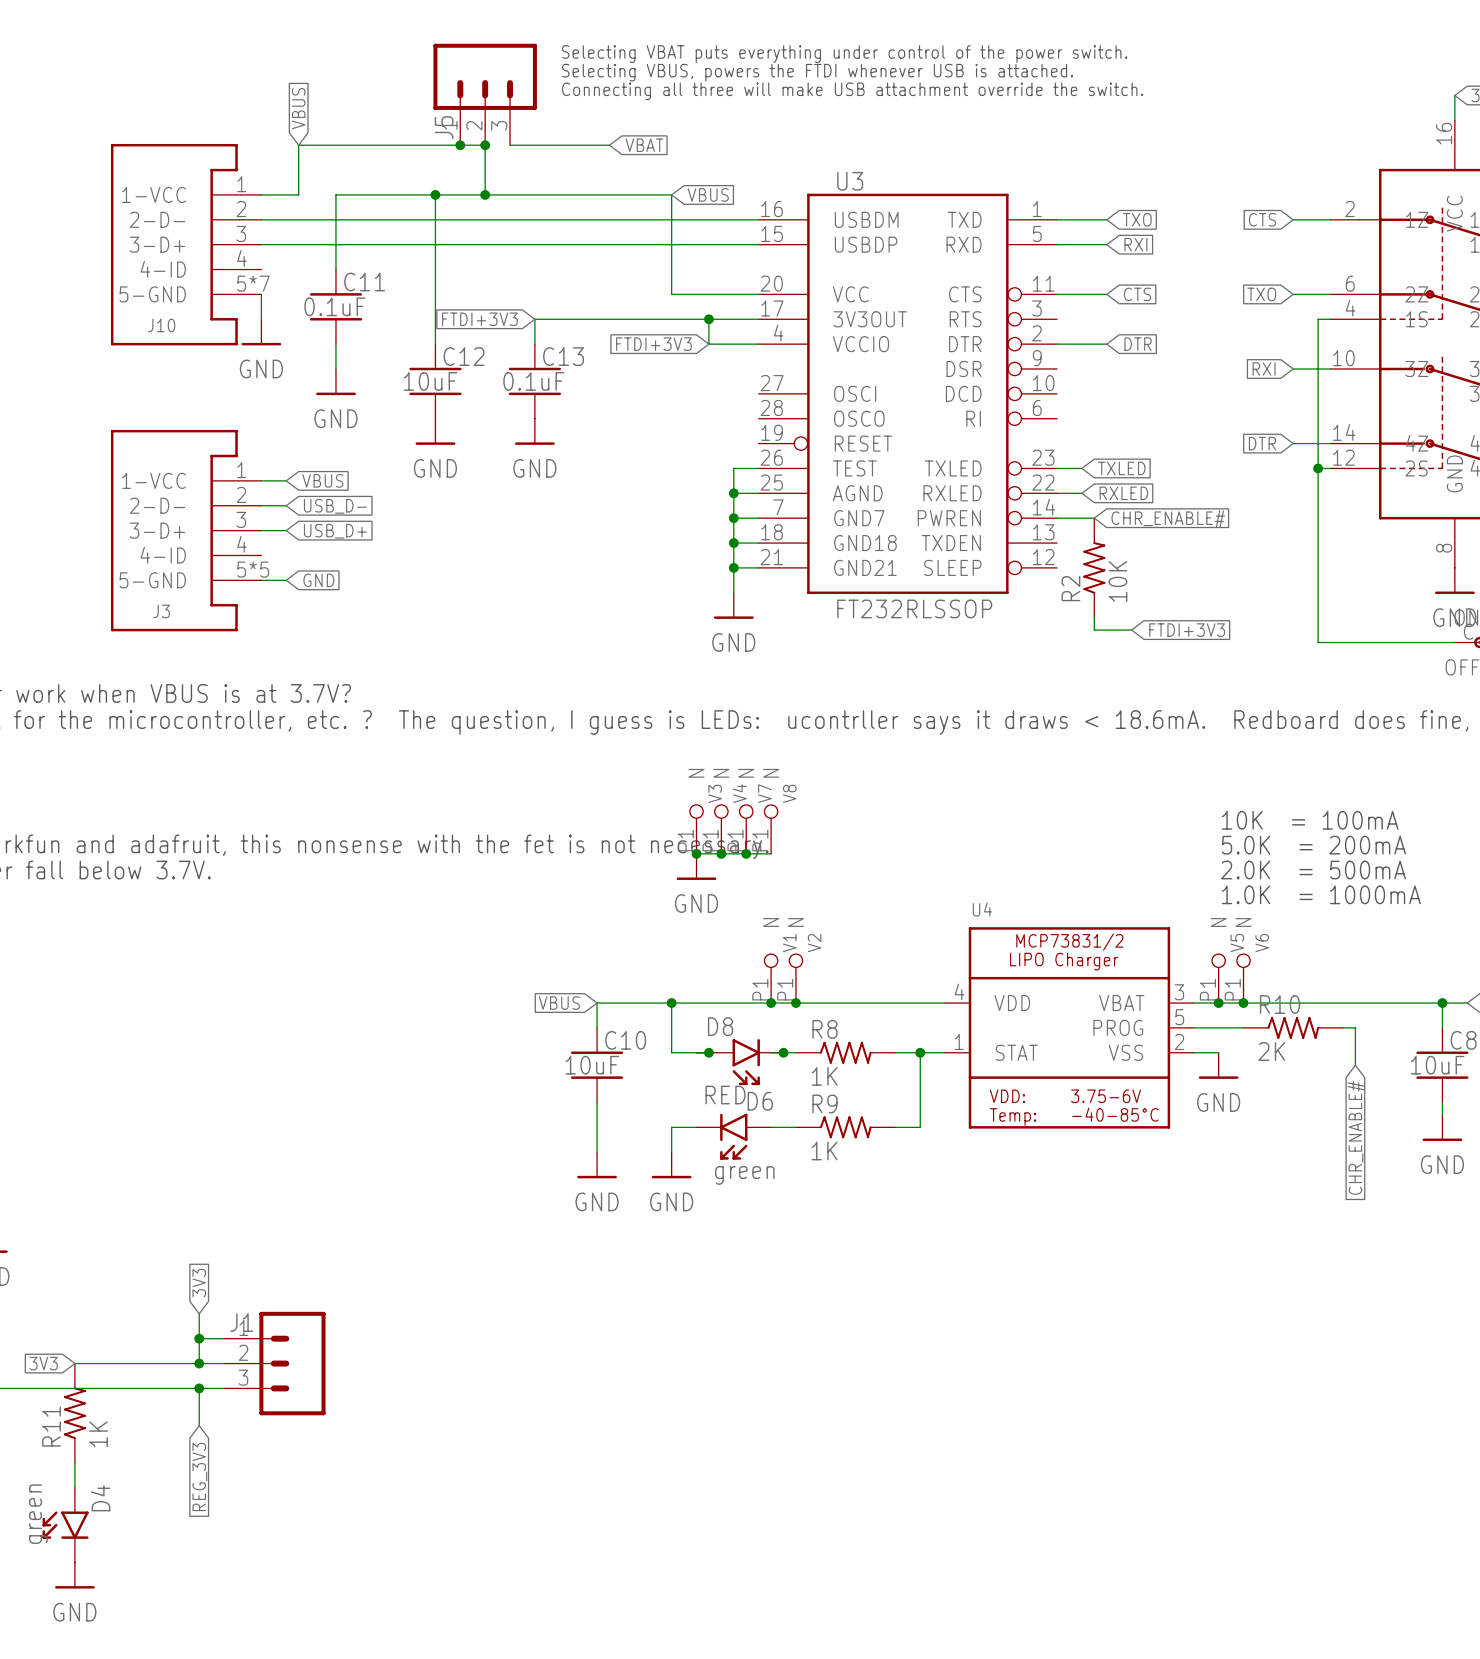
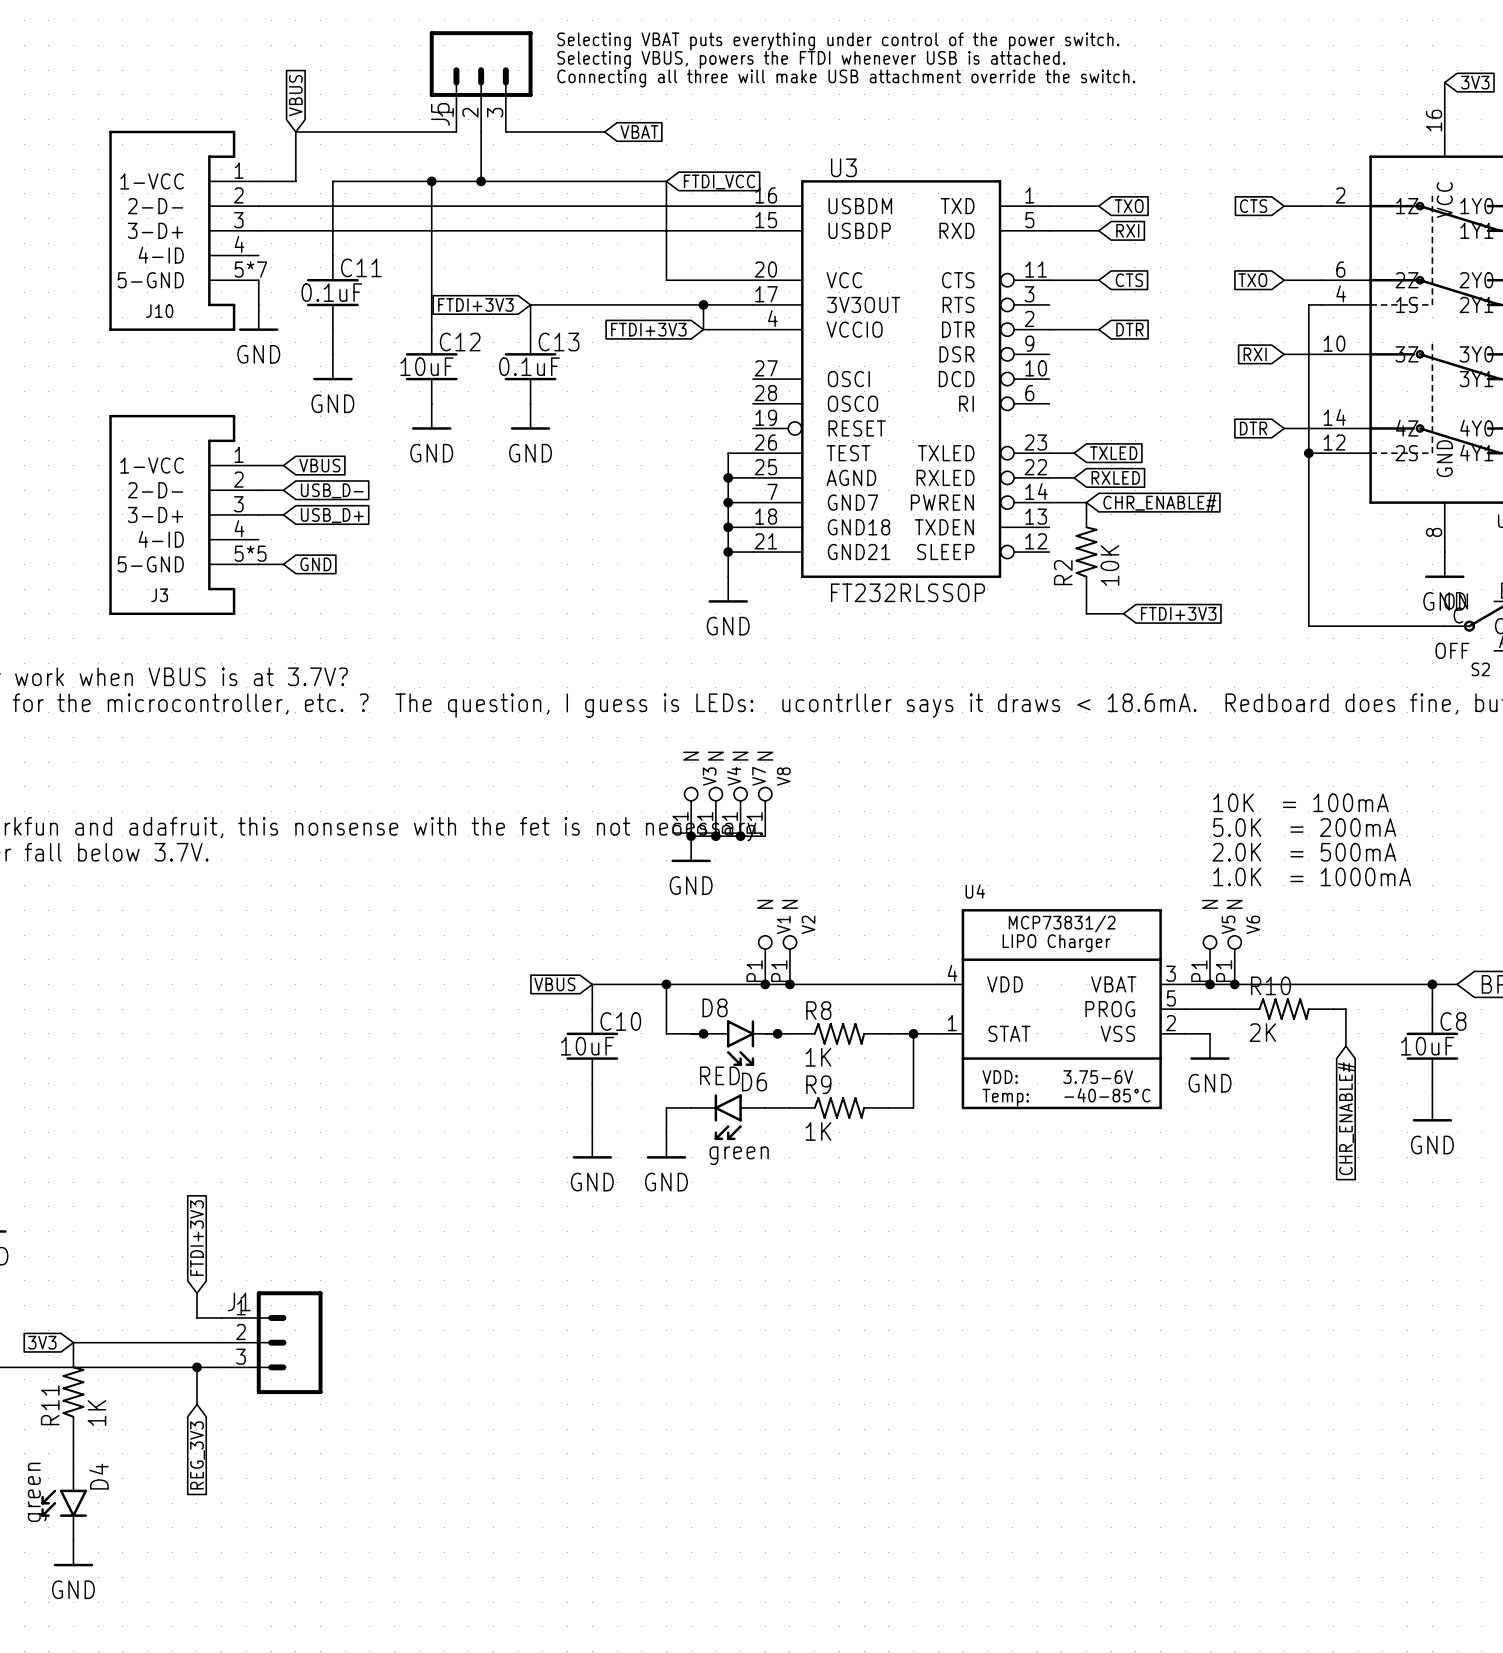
wire: (460, 145) (485, 145) -> none
junction: (460, 145) -> none
junction: (485, 145) -> none
global label: VBUS (708, 194) -> FTDI_VCC (719, 181)
global label: 3V3 (199, 1283) -> FTDI+3V3 (196, 1238)
wire: (199, 1338) (199, 1363) -> none
junction: (199, 1338) -> none
junction: (199, 1363) -> none

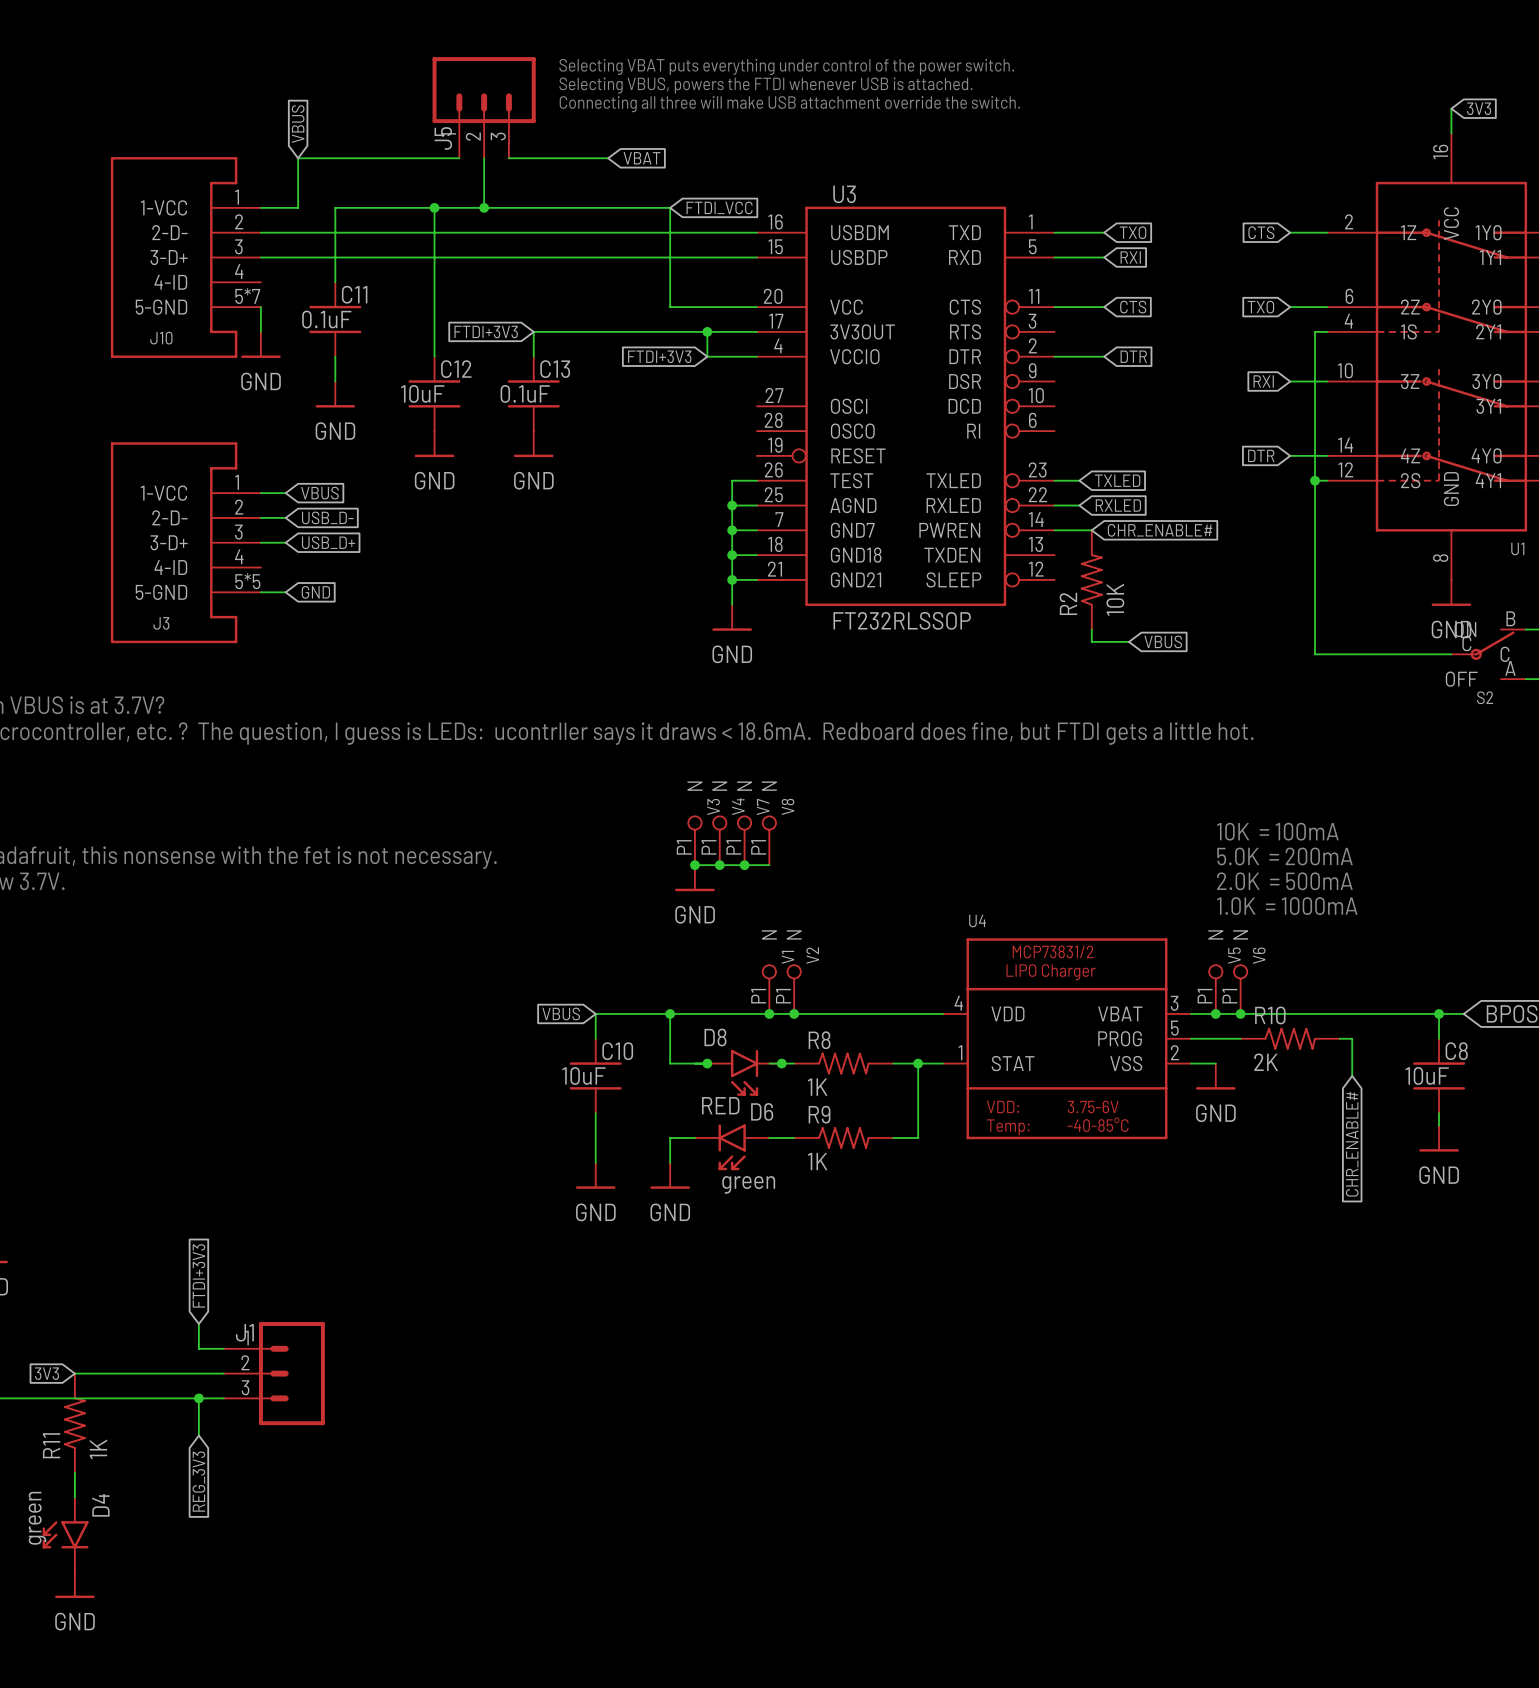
global label: FTDI+3V3 (1178, 613) -> VBUS (1163, 641)

